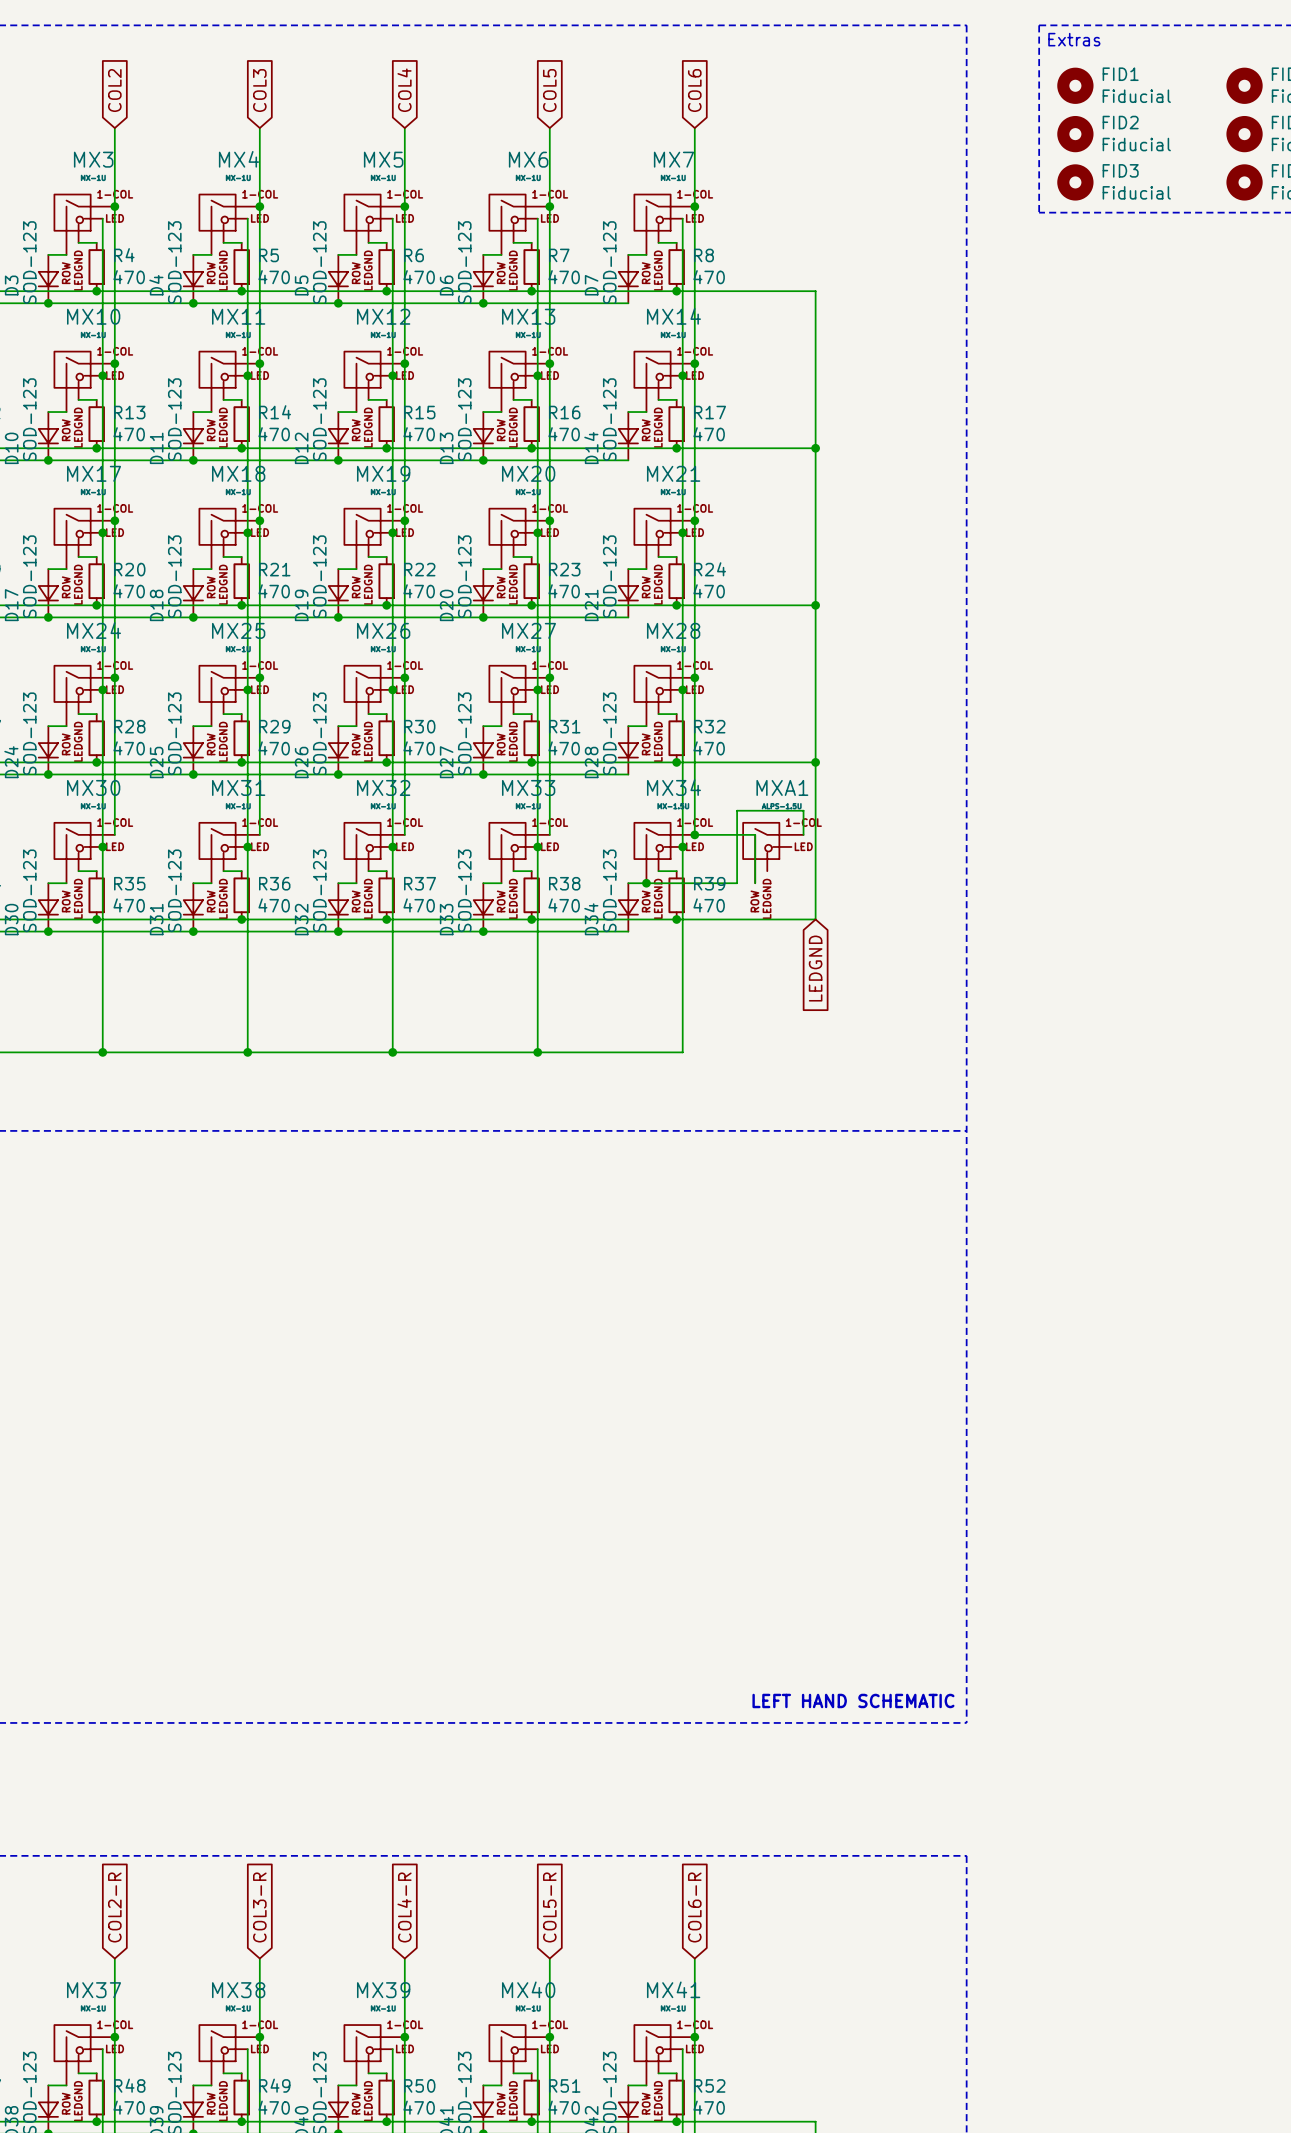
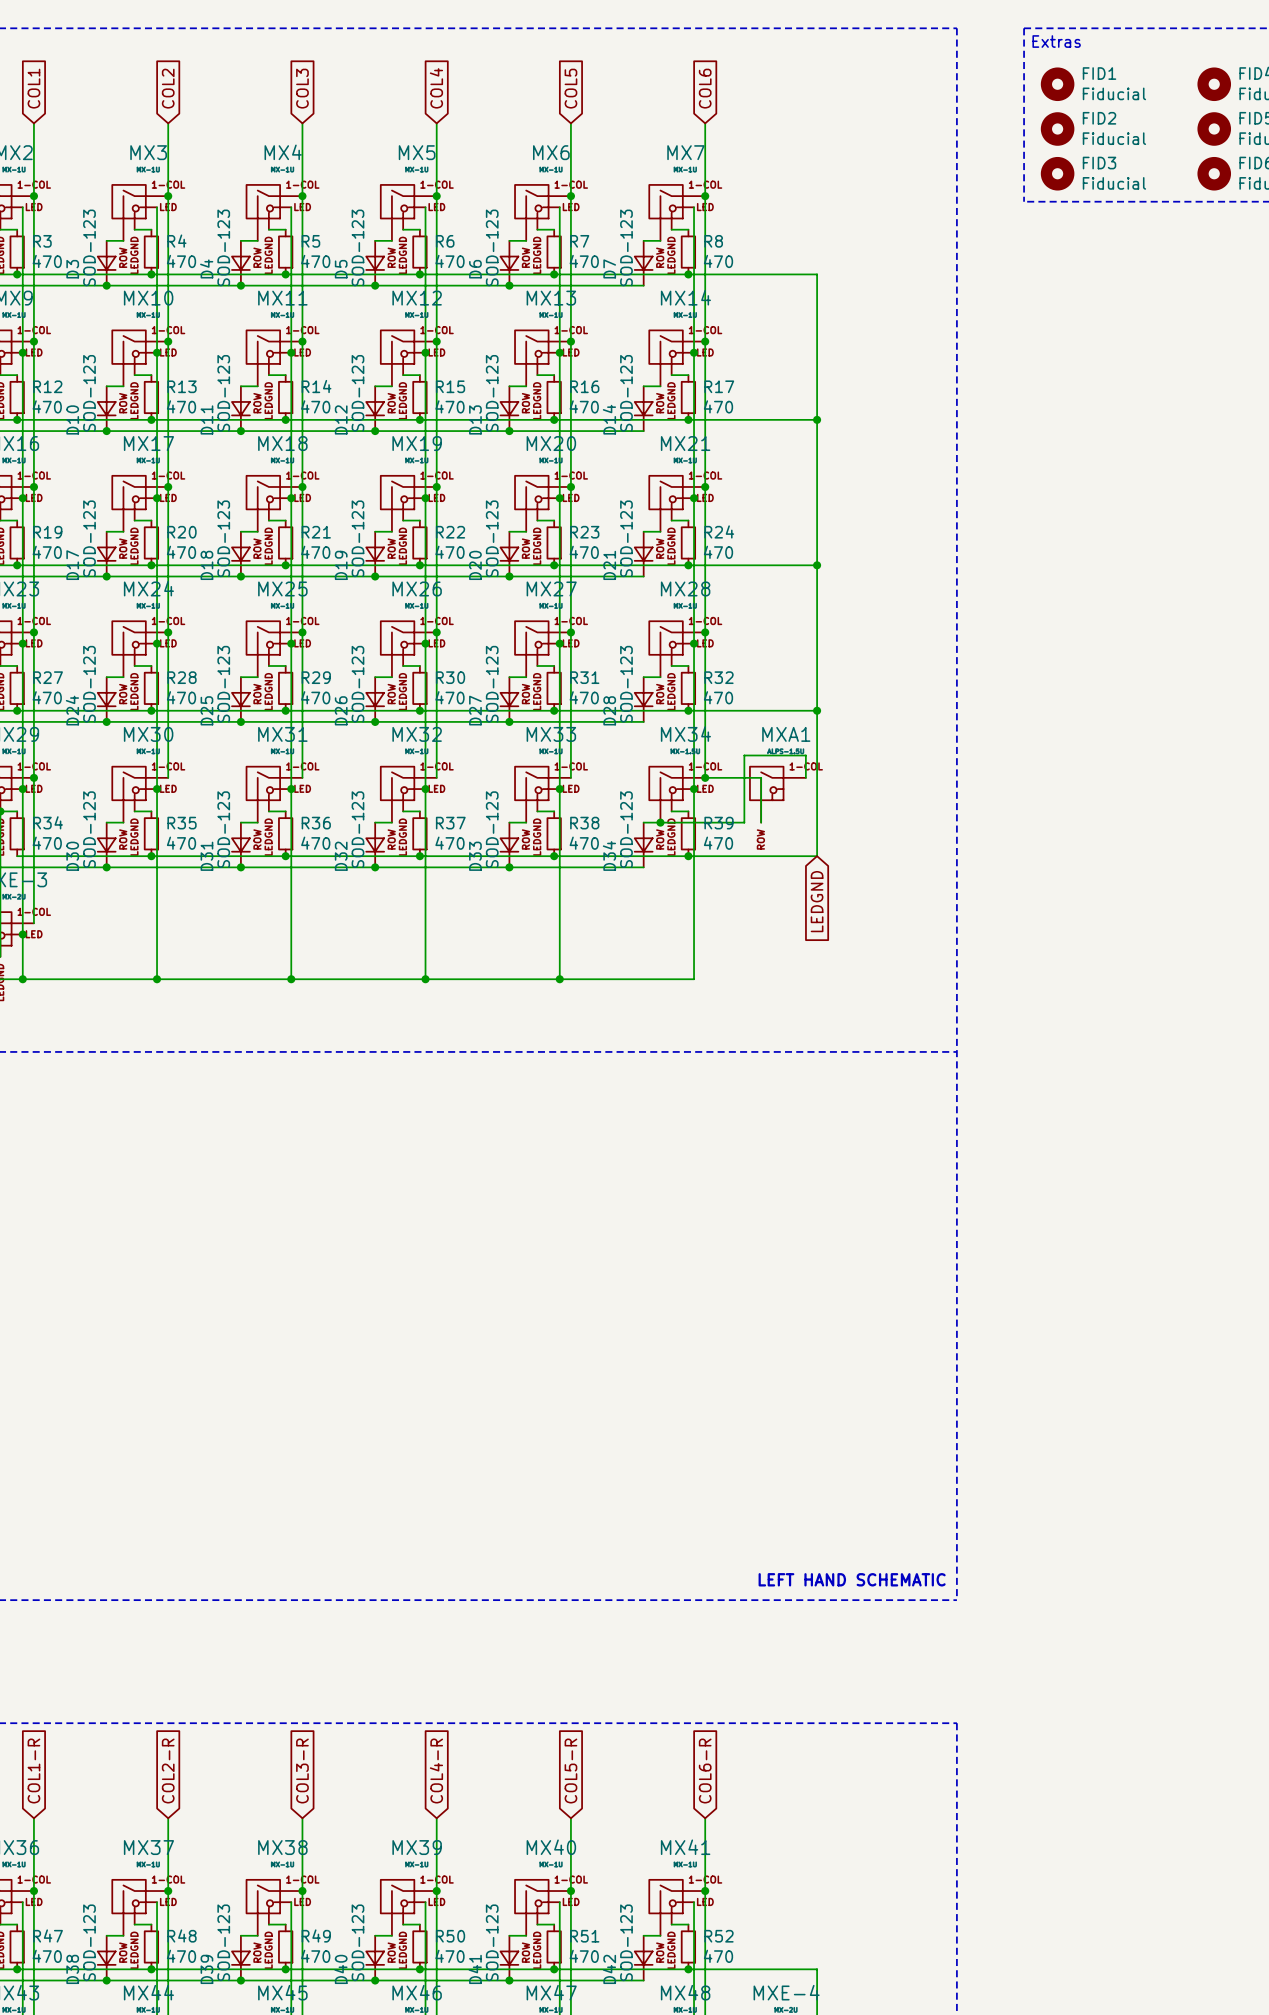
MXA1 symbol: [742, 822, 804, 884] -> [749, 766, 806, 823]

